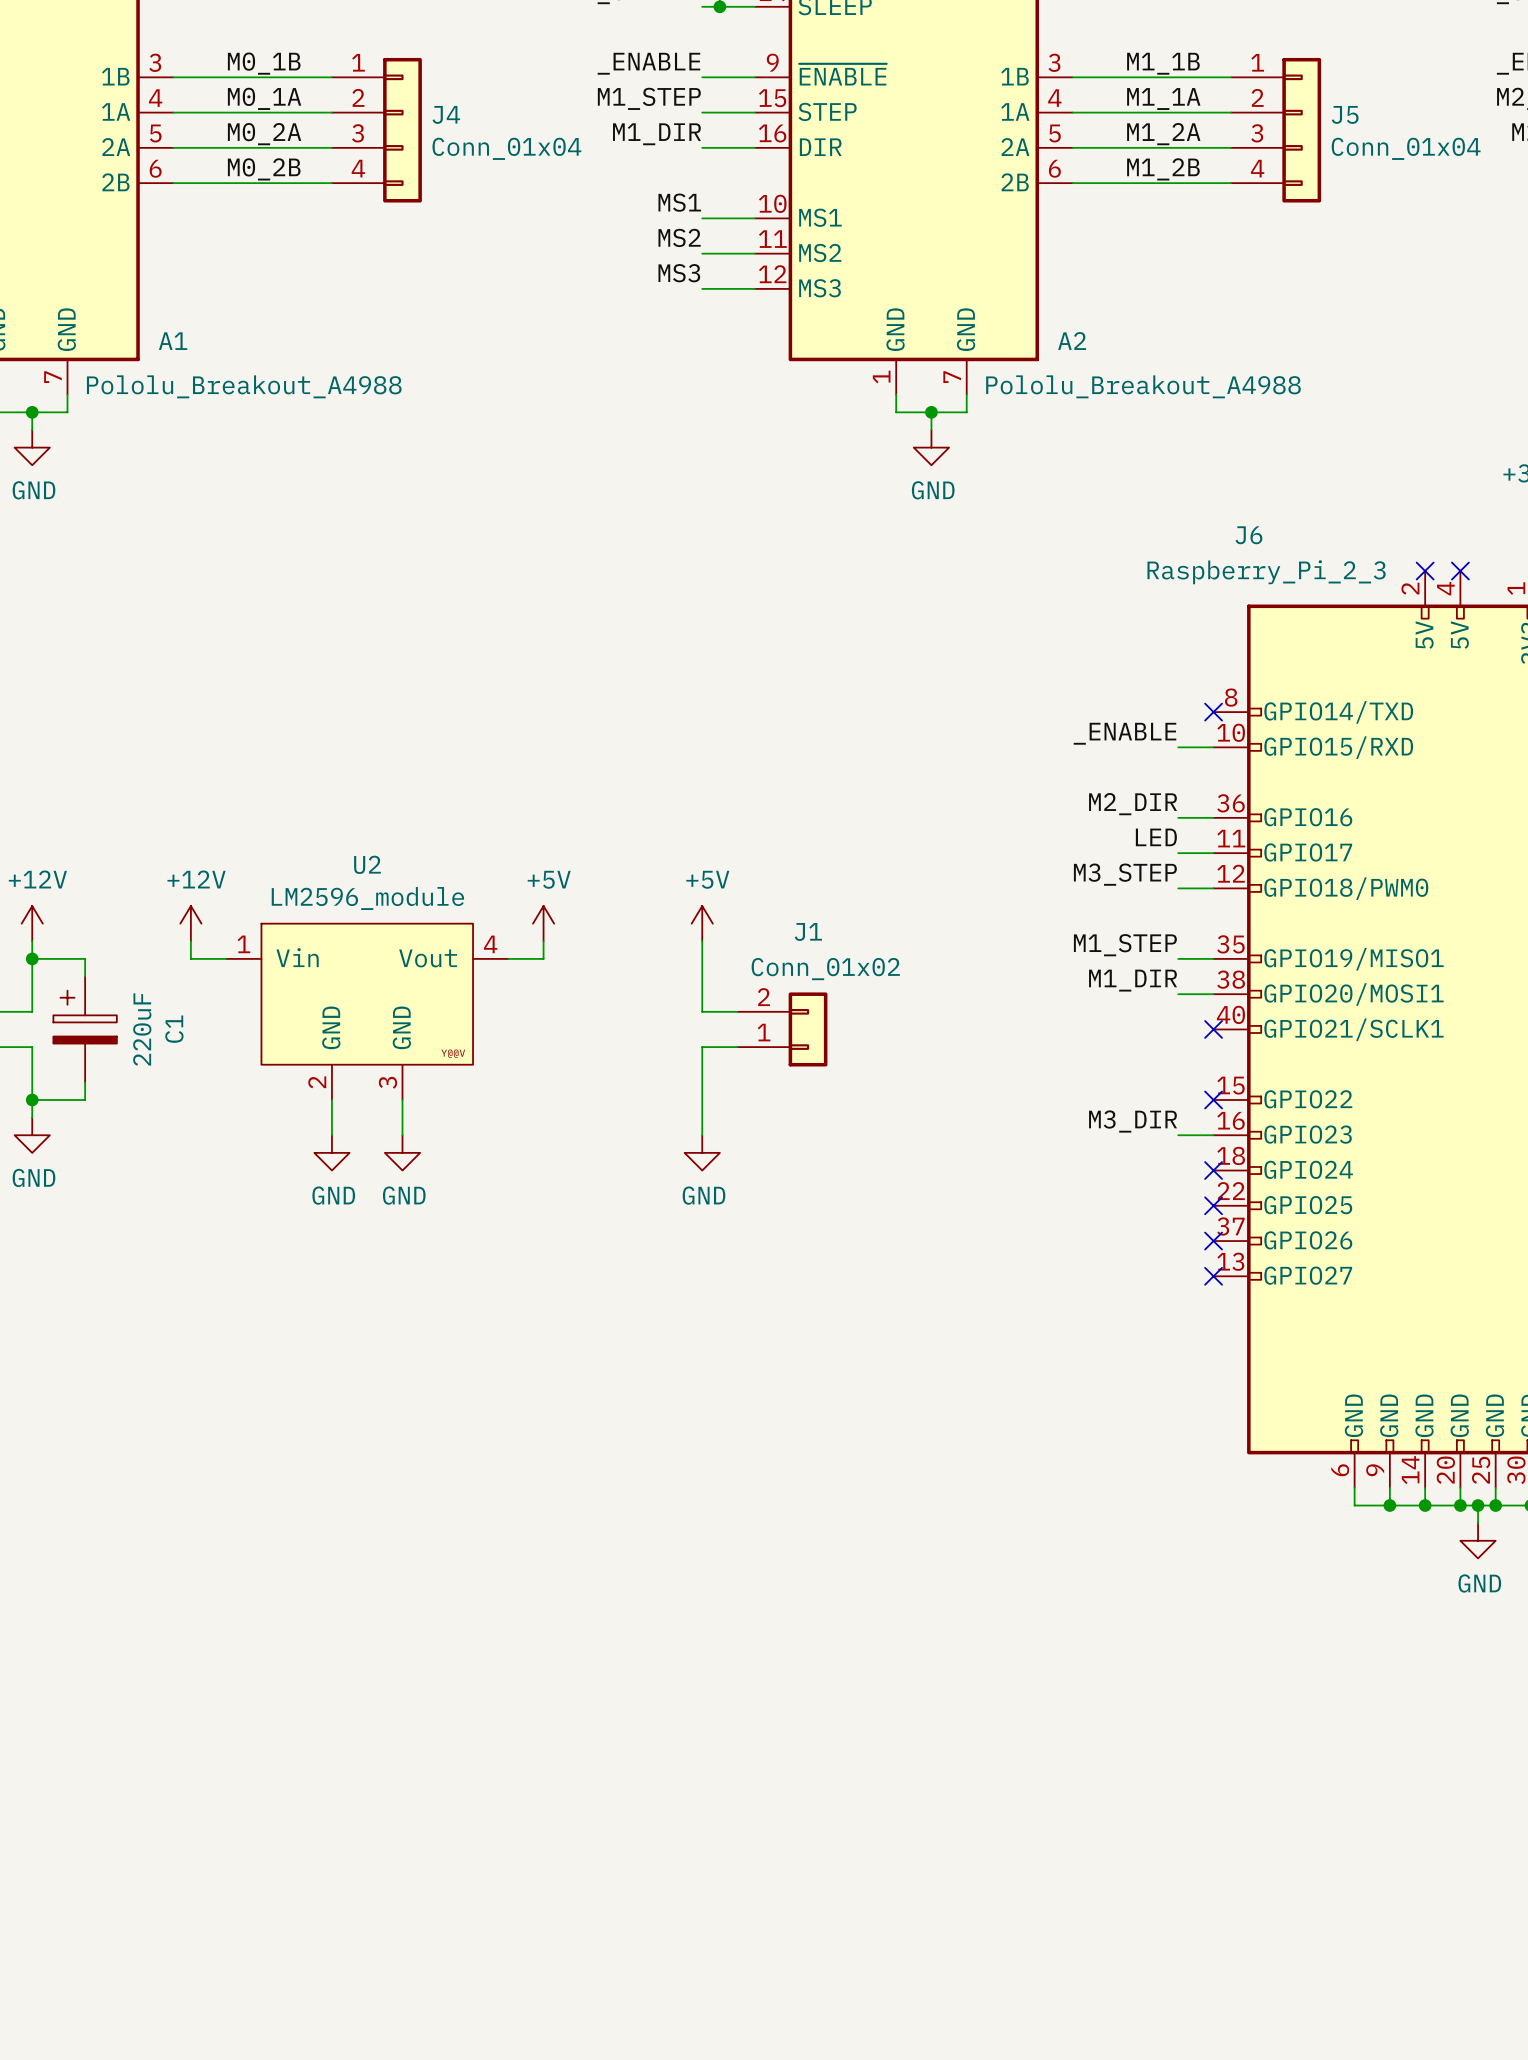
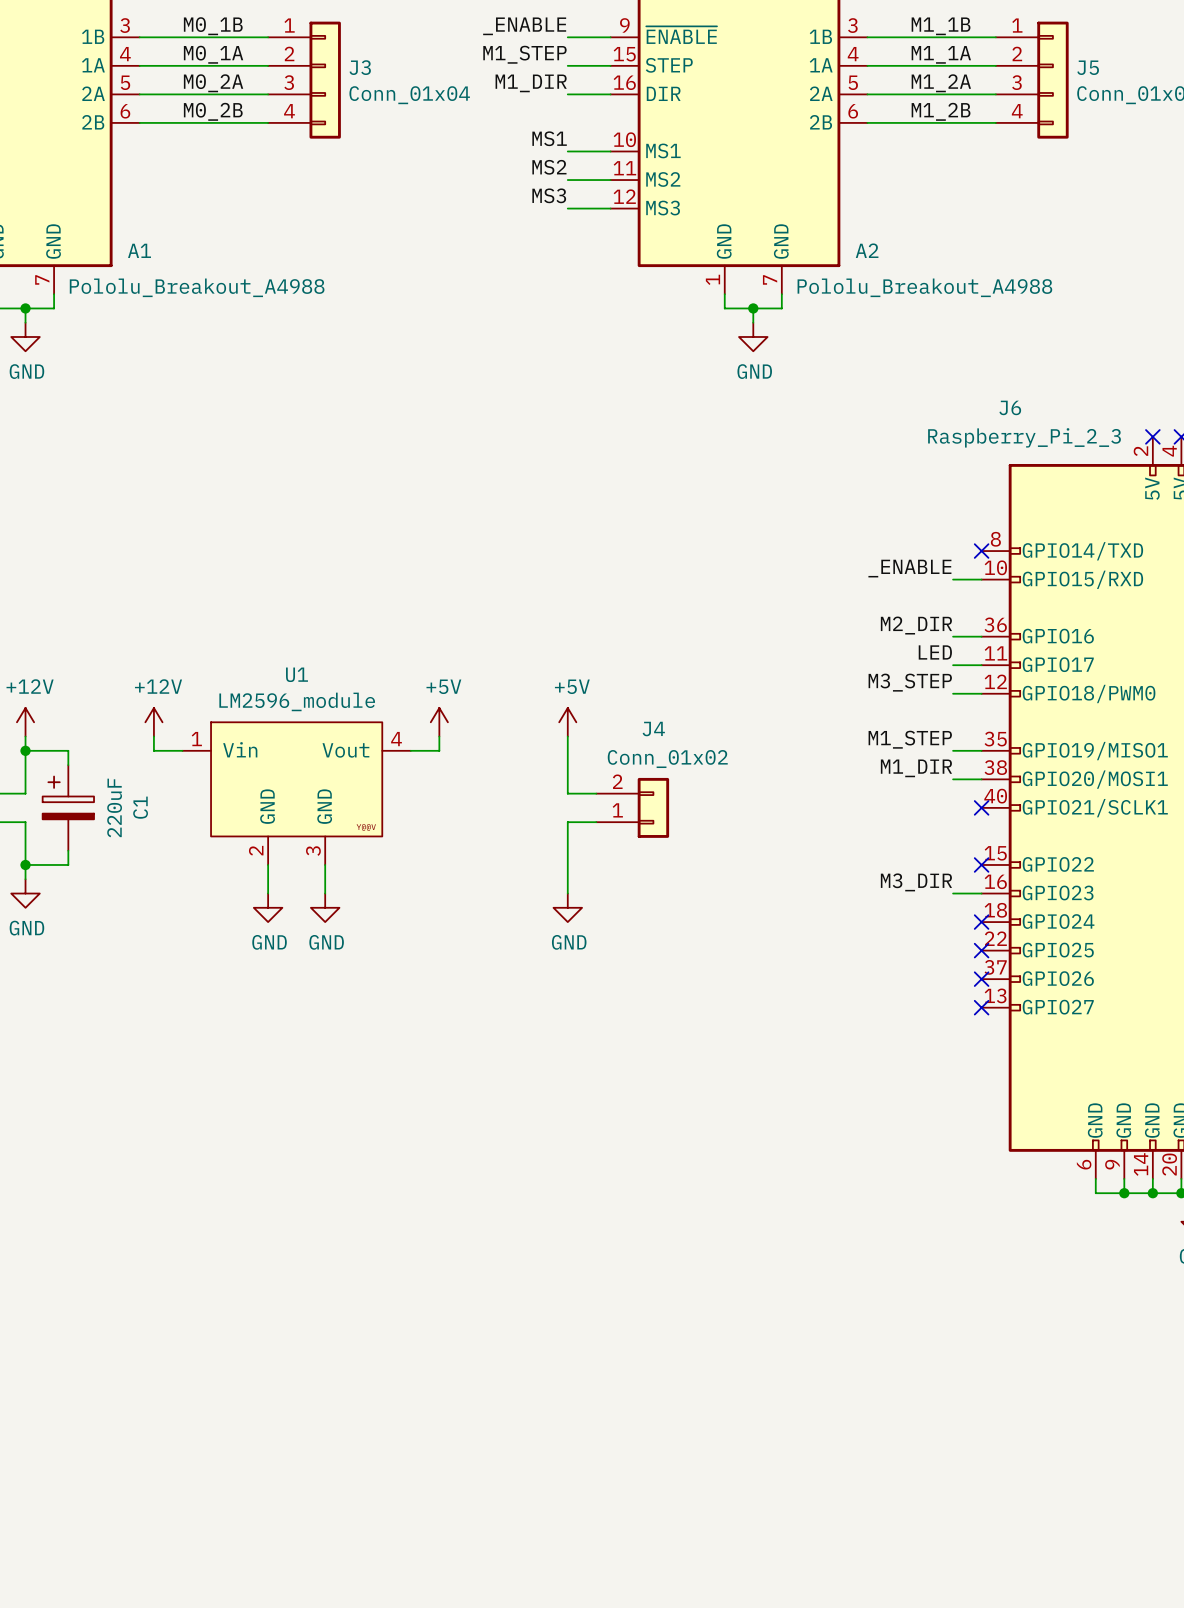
J4 name: J4 (446, 114) -> J3 (360, 67)
U2 name: U2 (367, 864) -> U1 (296, 674)
J1 name: J1 (808, 931) -> J4 (653, 729)

